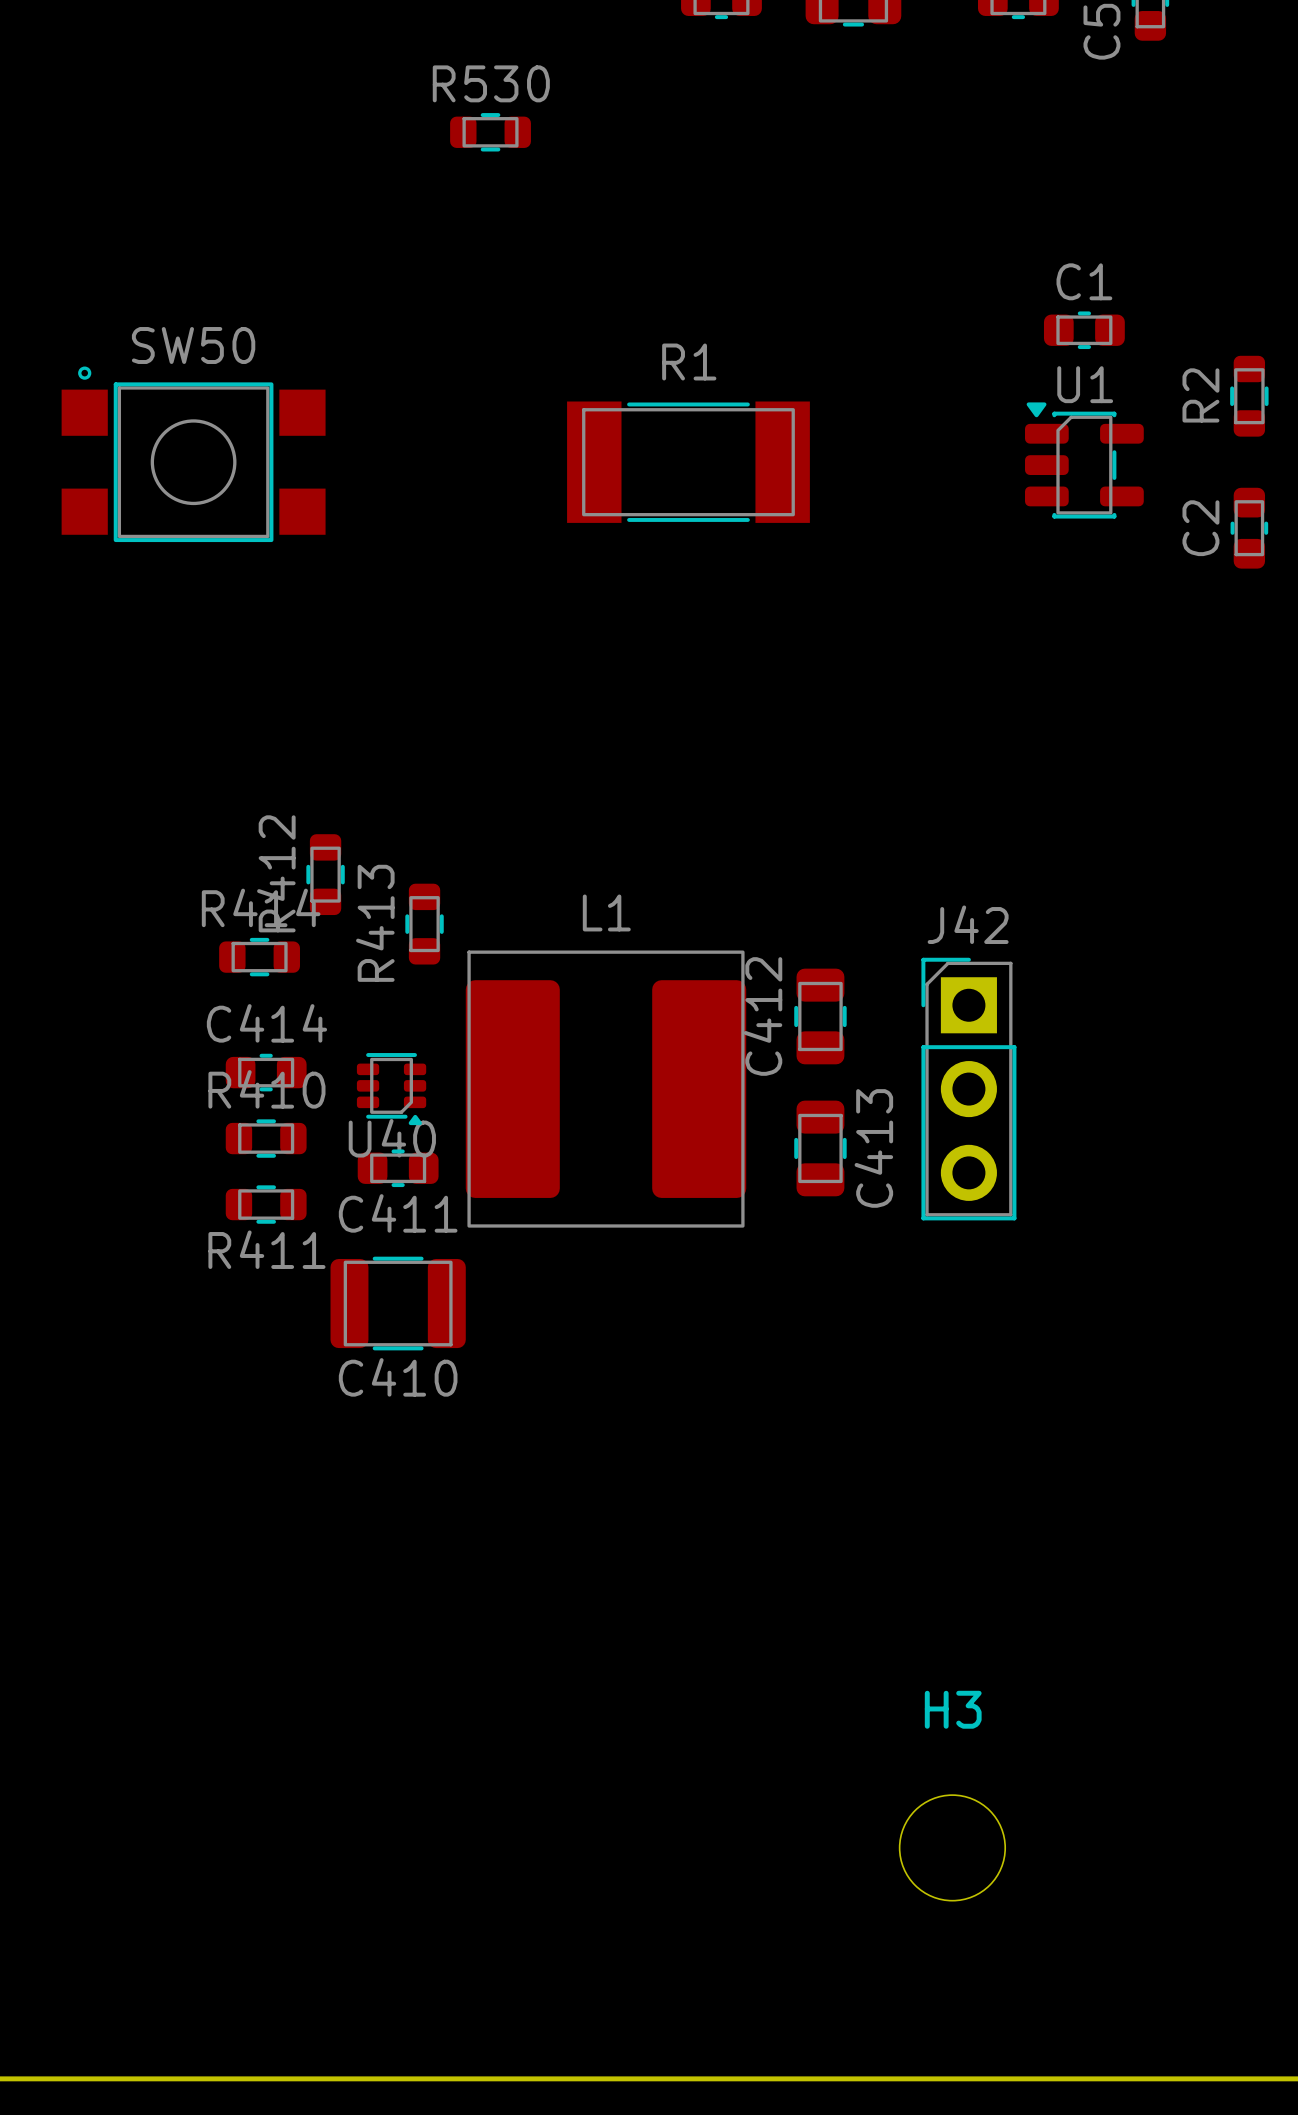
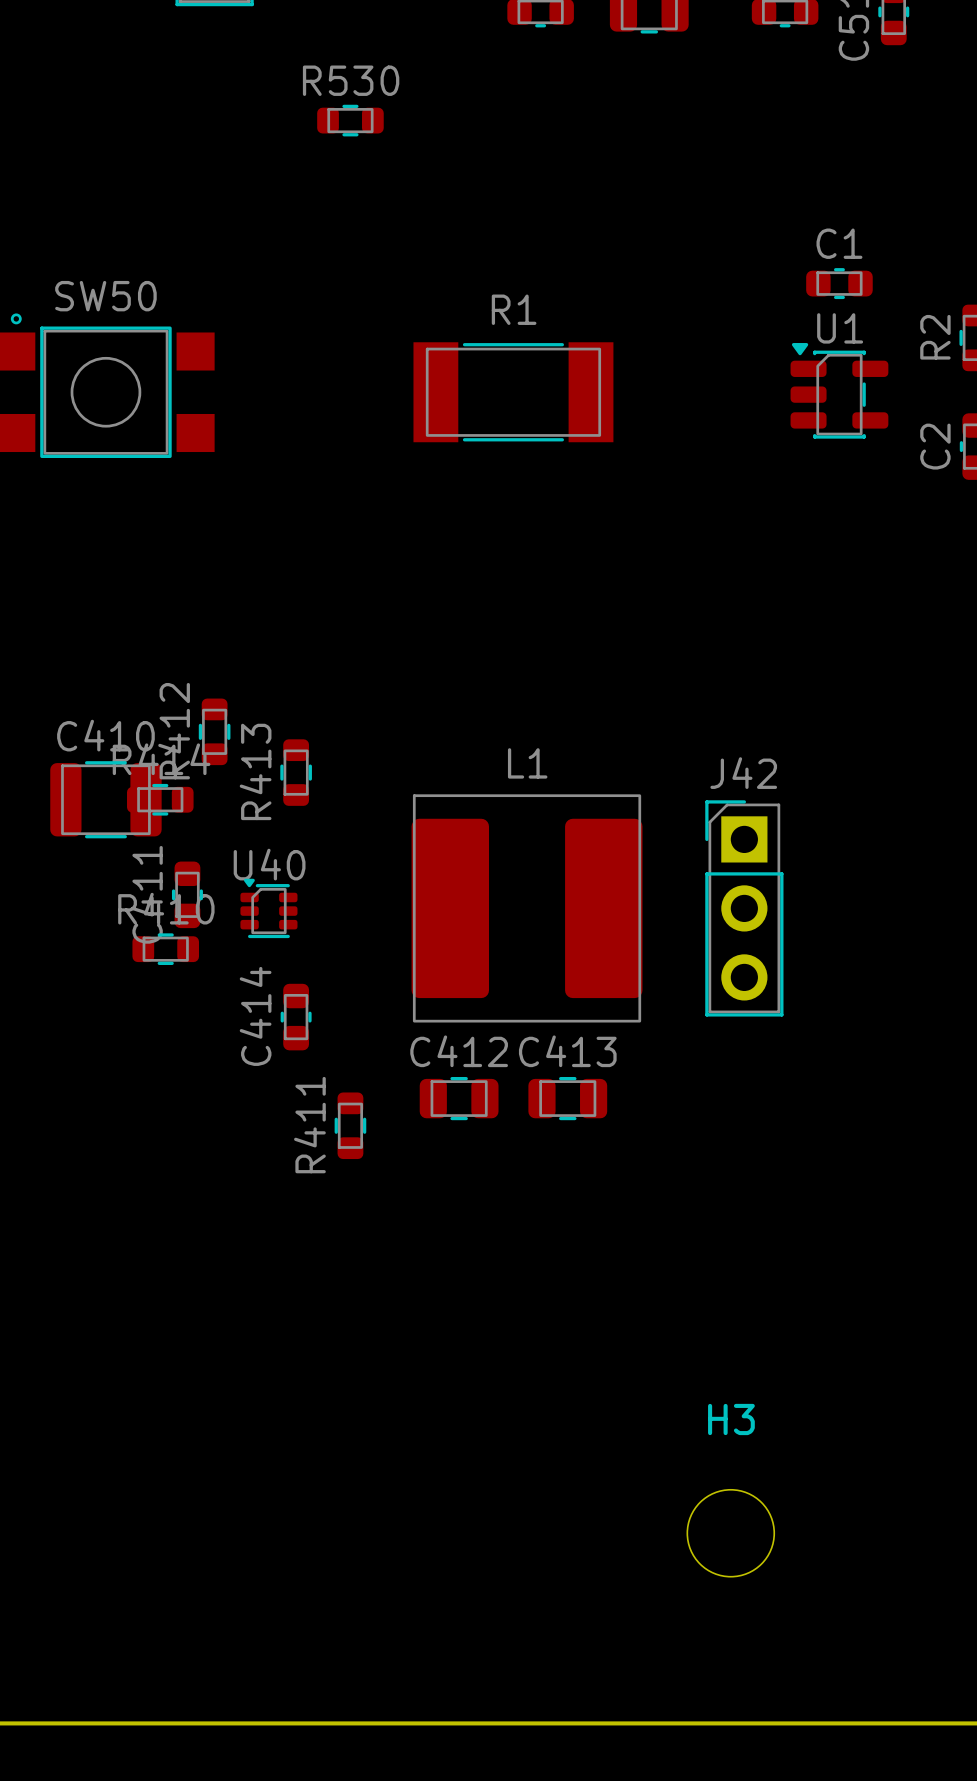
C412 rotation: 0° (820, 1016) -> 90° clockwise (459, 1098)
C412 position: (820, 1016) -> (459, 1098)
C414 name position: C414 (266, 1023) -> C414 (255, 1016)
C414 rotation: 0° (266, 1072) -> 90° clockwise (296, 1017)
C414 position: (266, 1072) -> (296, 1017)
U40 rotation: 0° (391, 1089) -> 180° (268, 908)
L1 position: (606, 1089) -> (527, 908)
C413 rotation: 0° (820, 1148) -> 90° clockwise (567, 1098)
C413 position: (820, 1148) -> (567, 1098)
C413 name position: C413 (873, 1148) -> C413 (567, 1051)
C411 rotation: 0° (398, 1168) -> 90° clockwise (187, 894)
C411 position: (398, 1168) -> (187, 894)
R411 rotation: 0° (266, 1204) -> 90° clockwise (350, 1125)
R411 position: (266, 1204) -> (350, 1125)
C410 position: (398, 1303) -> (105, 799)
C410 name position: C410 (398, 1377) -> C410 (105, 735)

